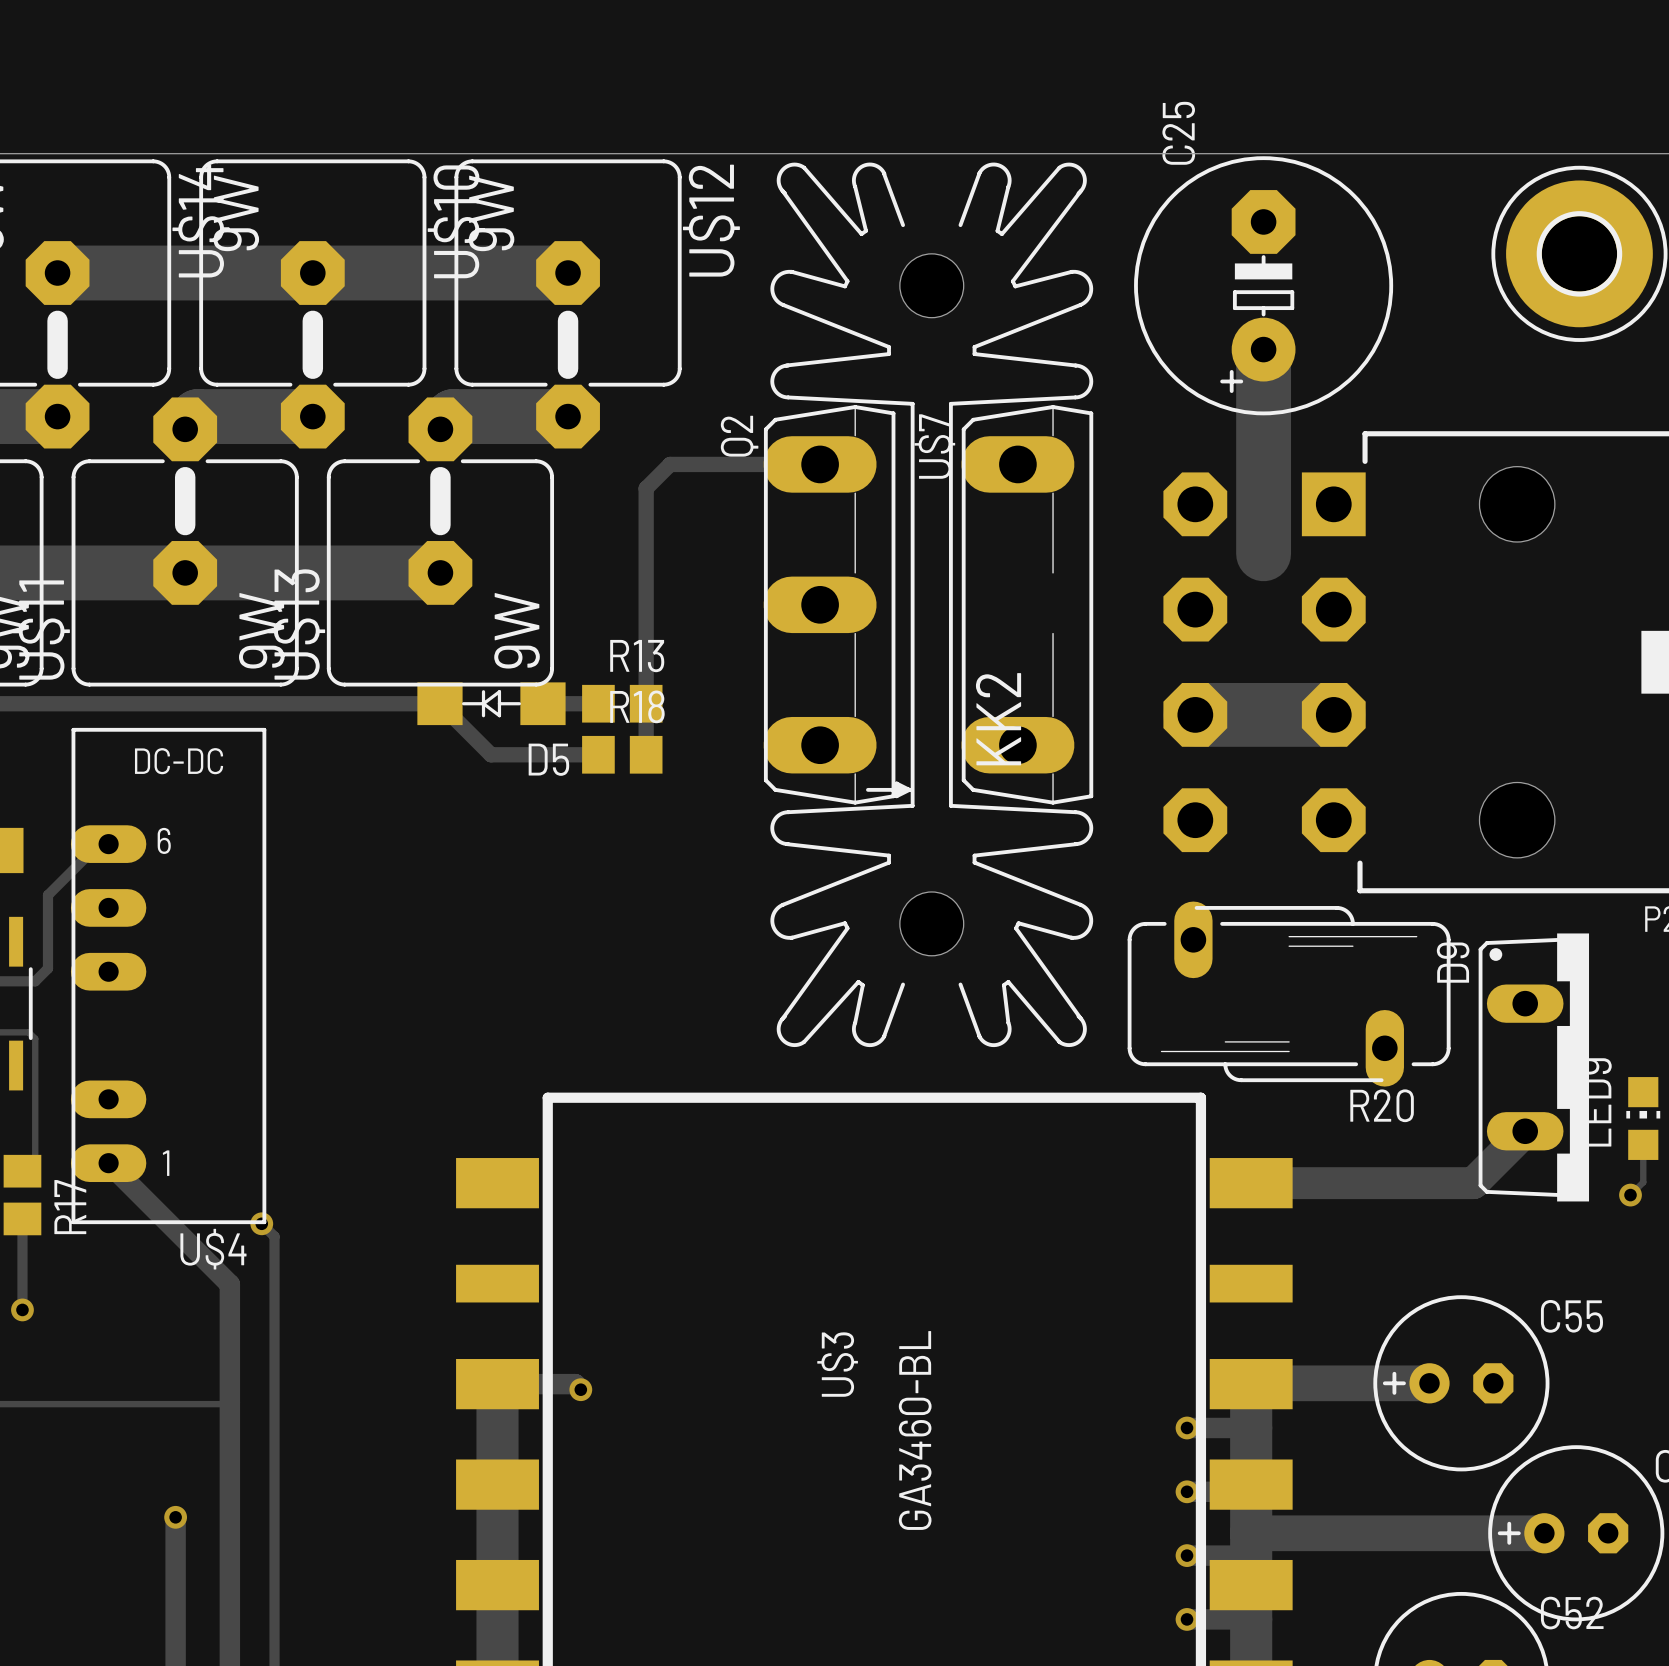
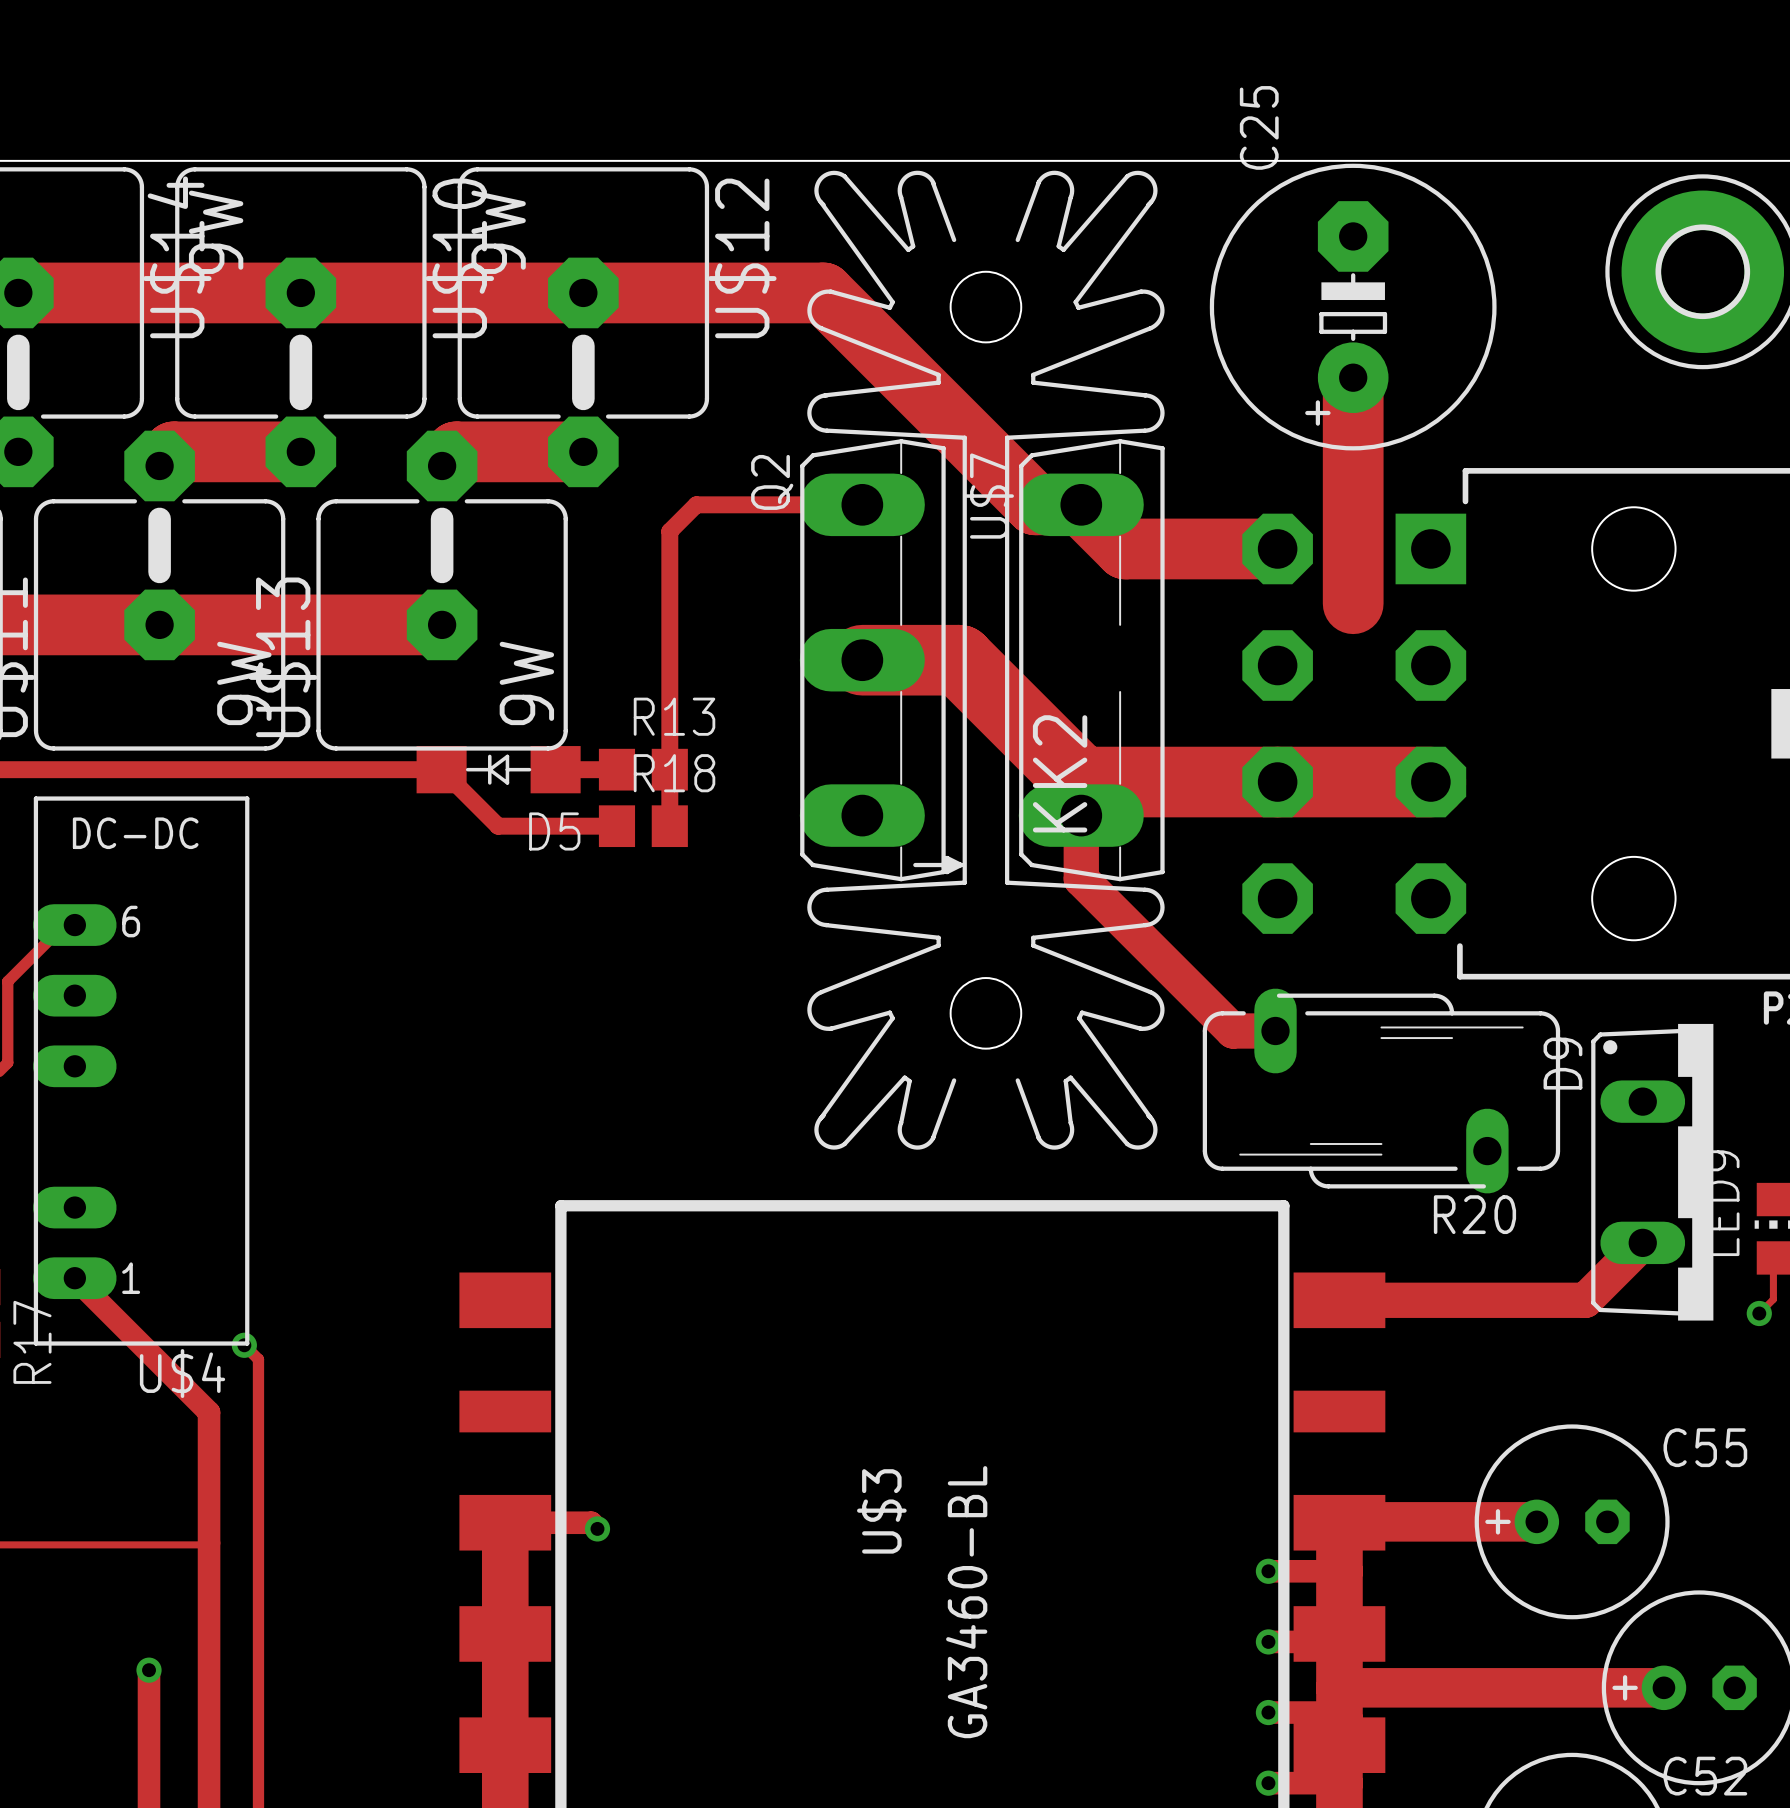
track: none -> (583, 292) (823, 292) (1035, 504) (1081, 504) (1125, 548) (1277, 548)
track: none -> (862, 660) (959, 660) (1081, 782)
track: none -> (1081, 782) (1277, 782)
track: none -> (1081, 782) (1081, 879) (1233, 1030) (1275, 1030)

